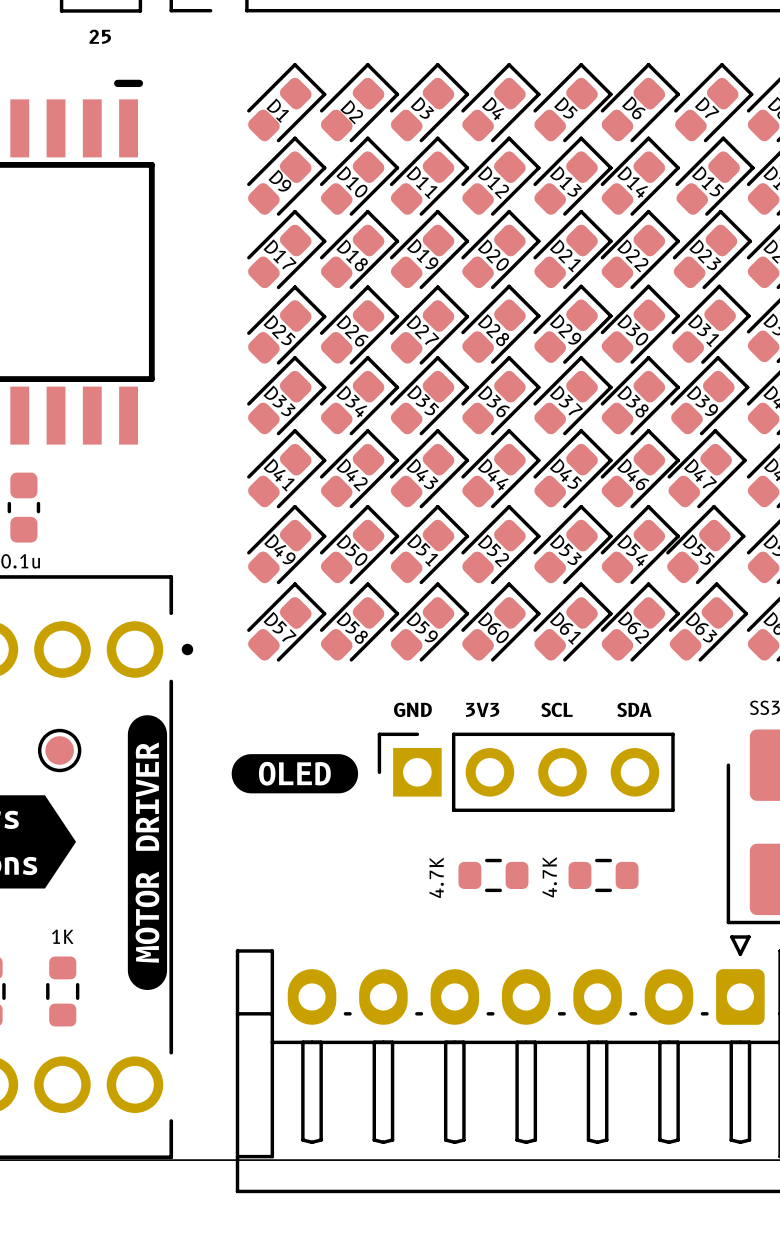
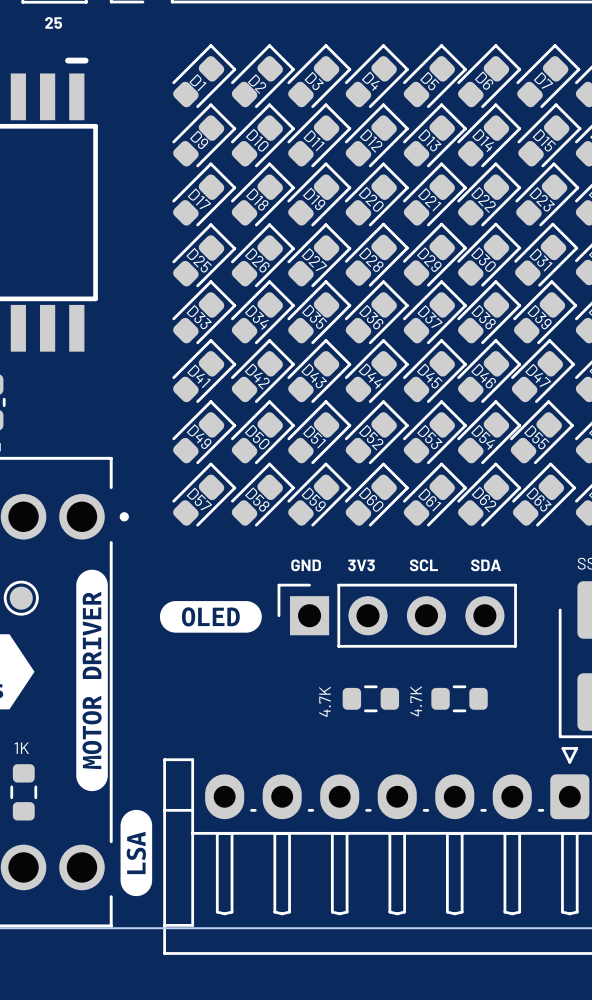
drawing: none -> [120, 809, 153, 897]

